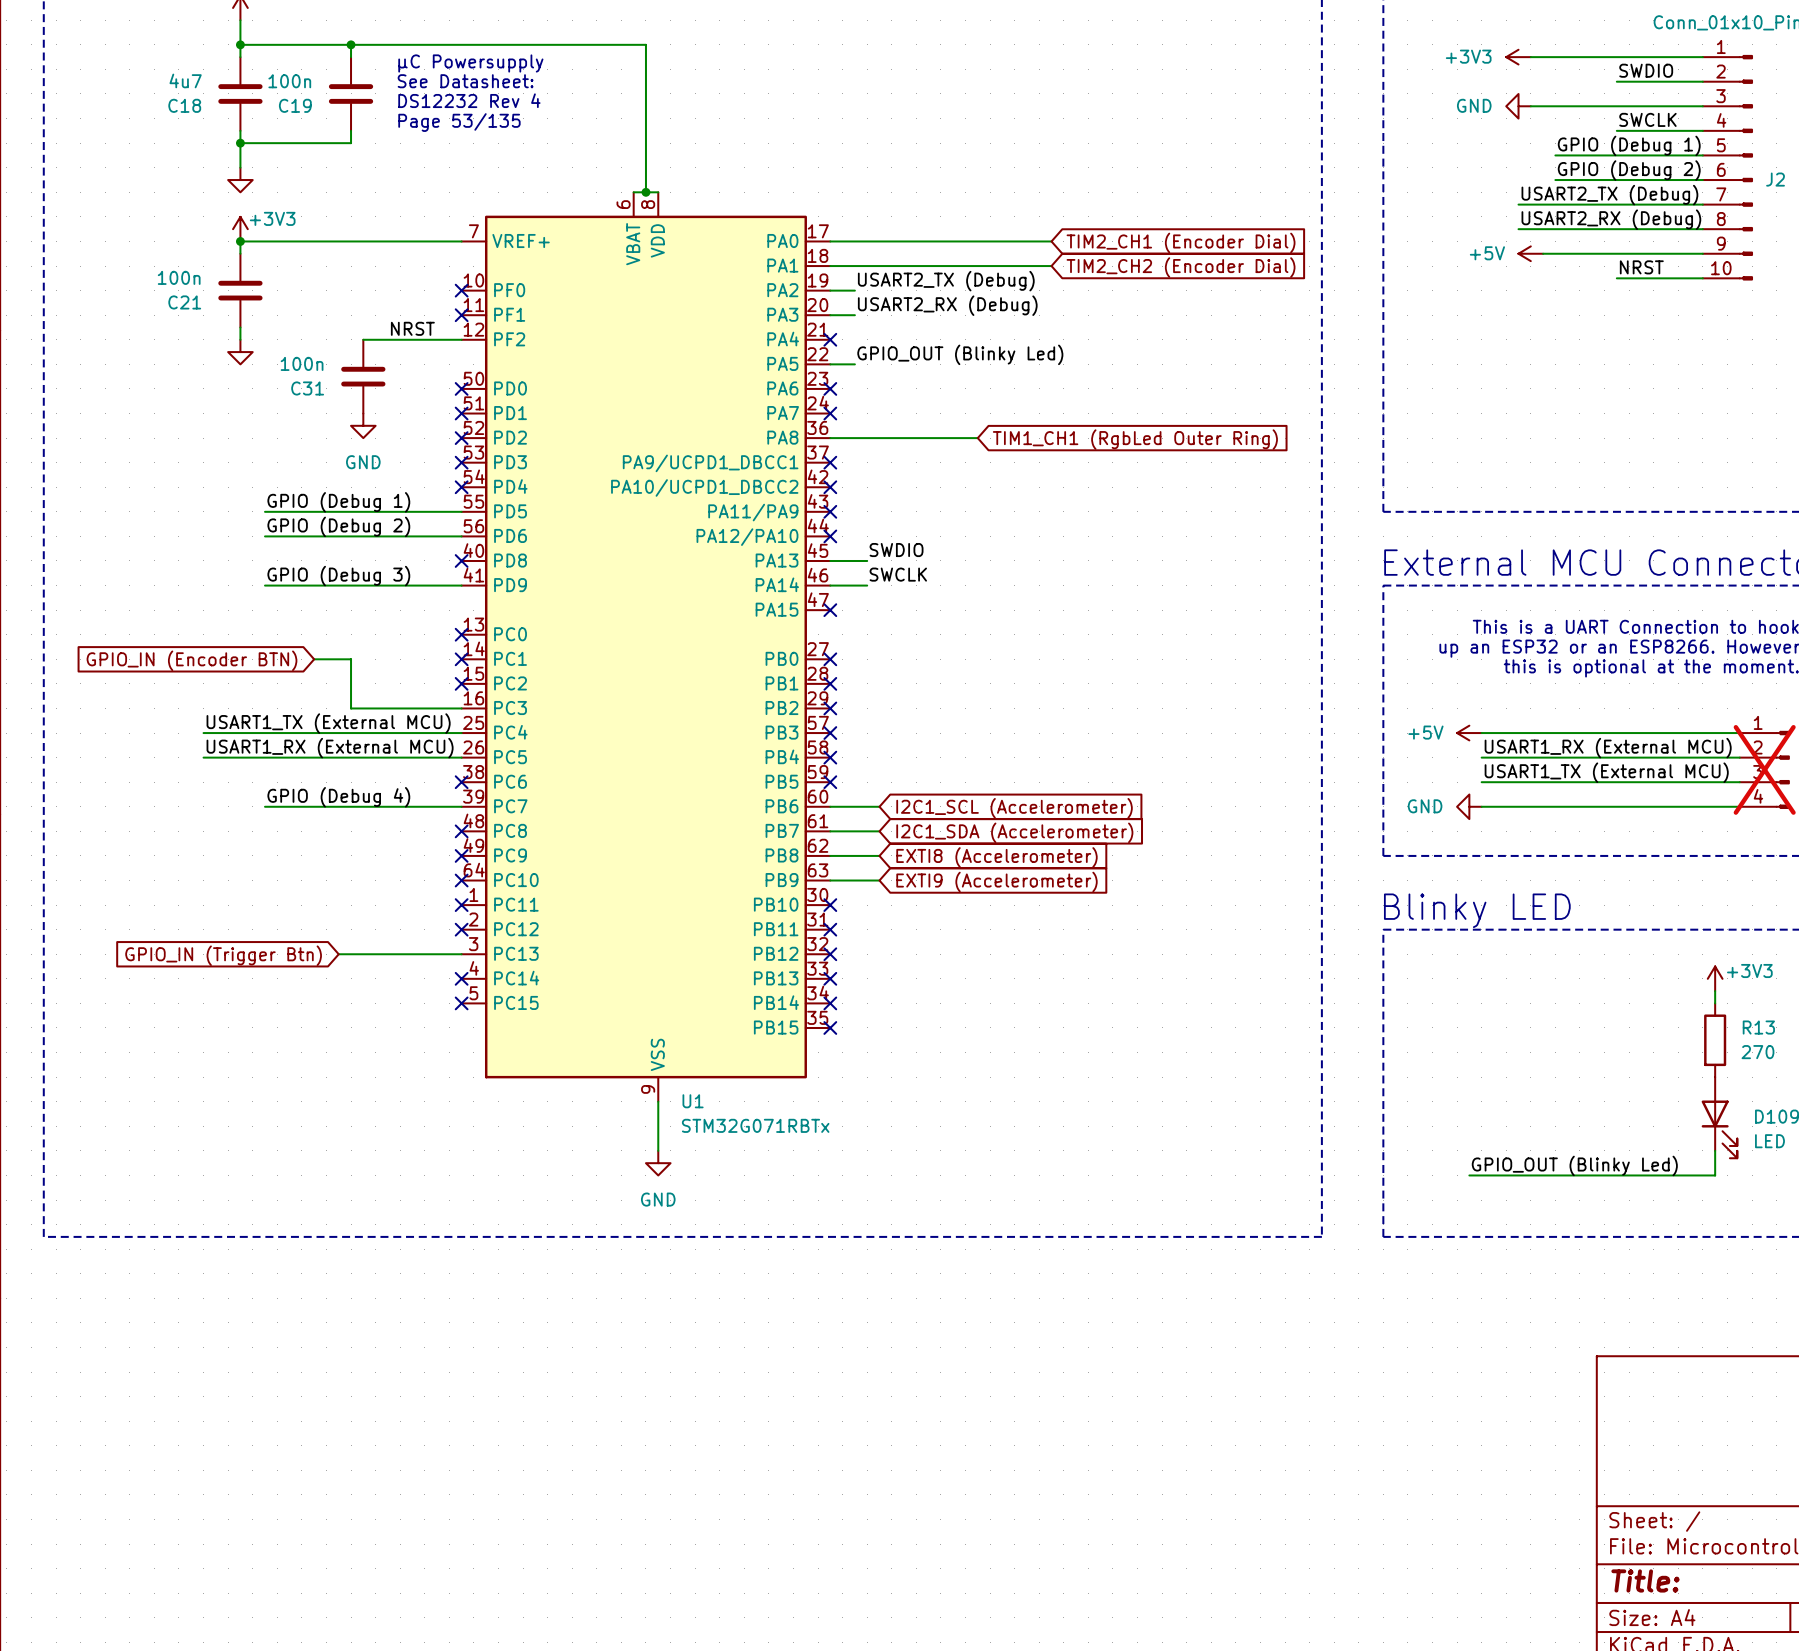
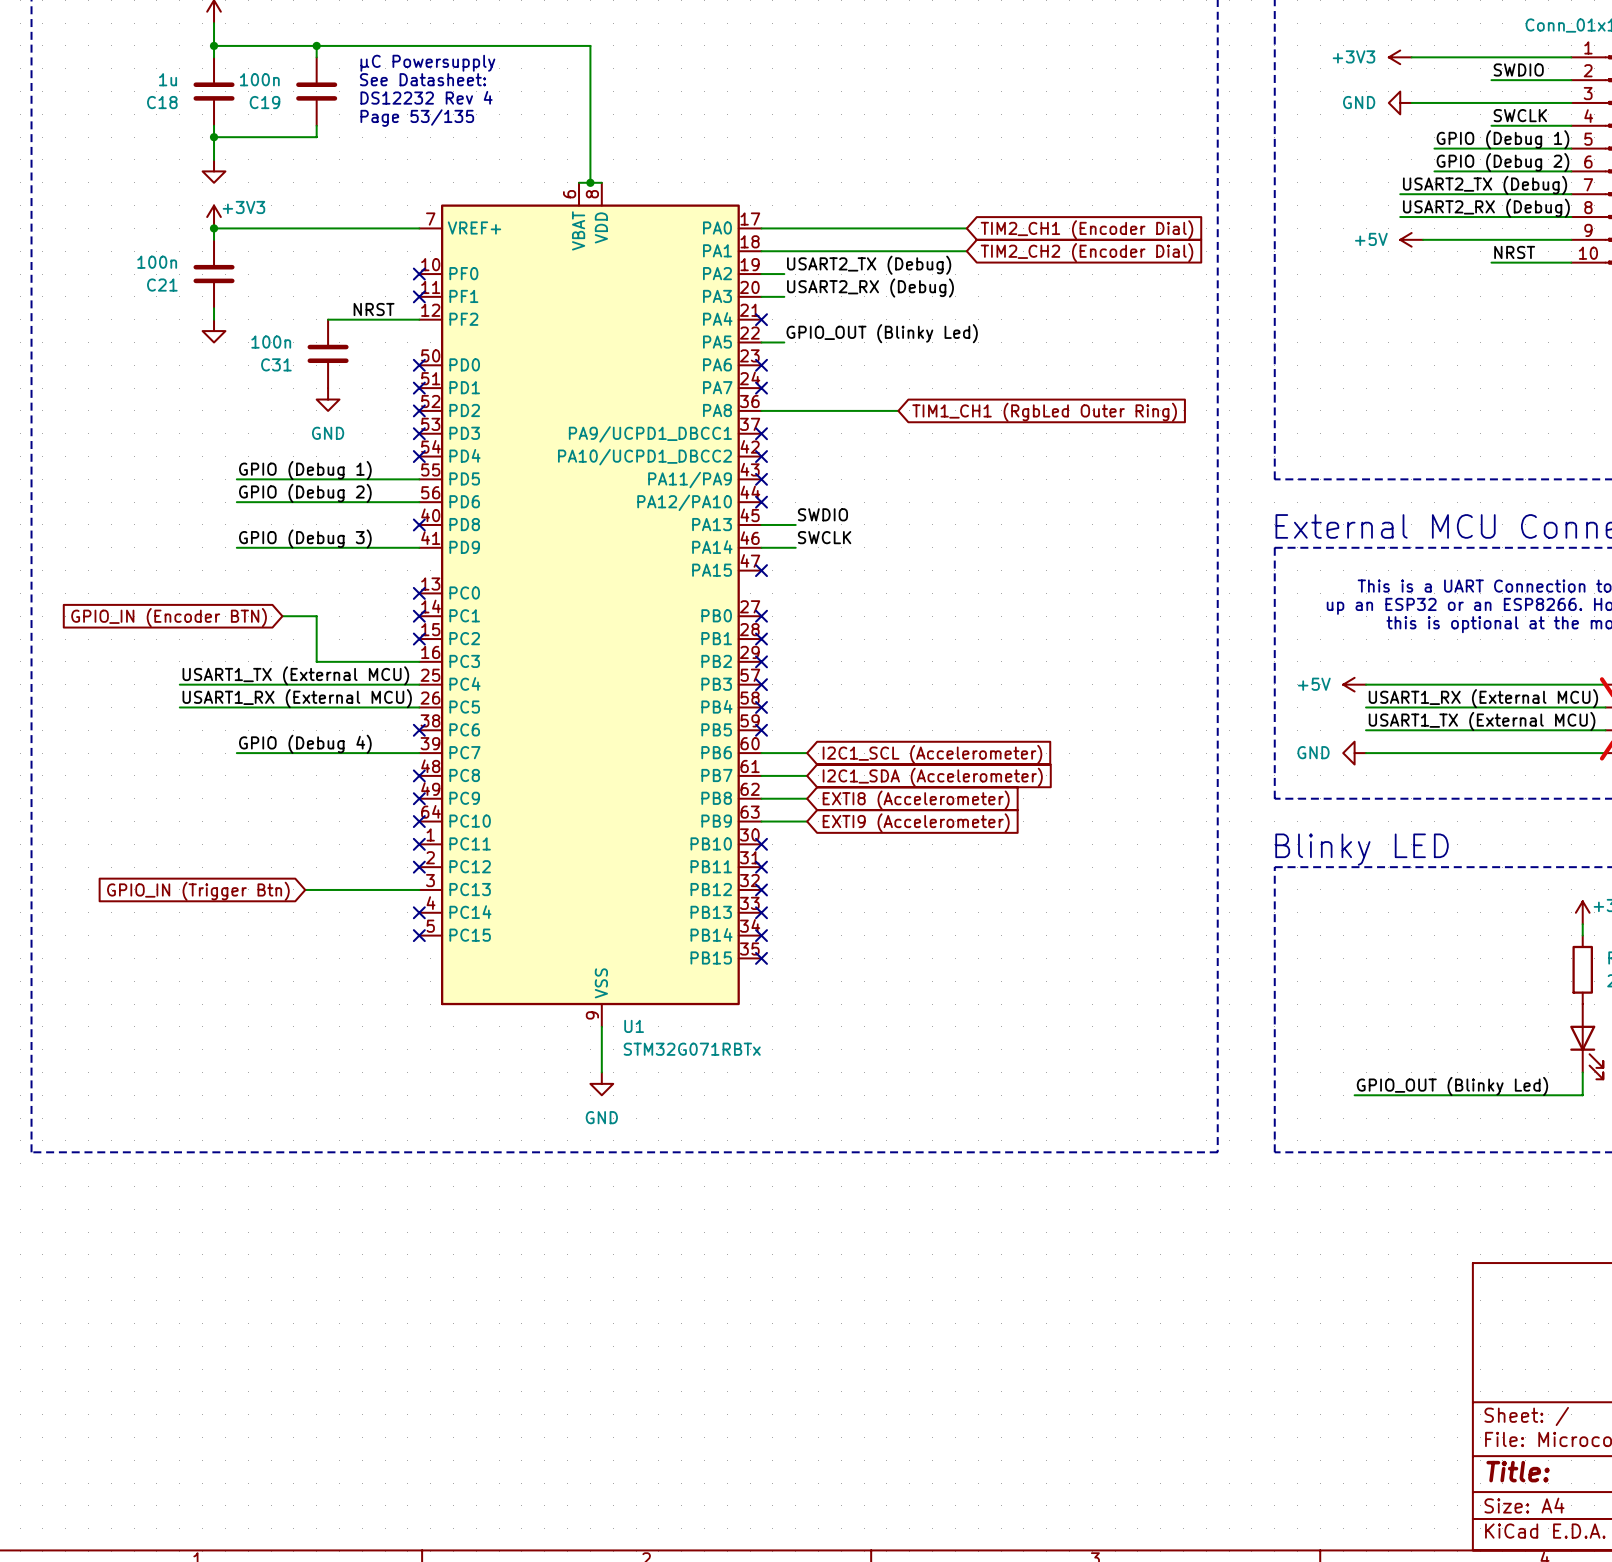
C18 value: 4u7 (185, 80) -> 1u (168, 79)

